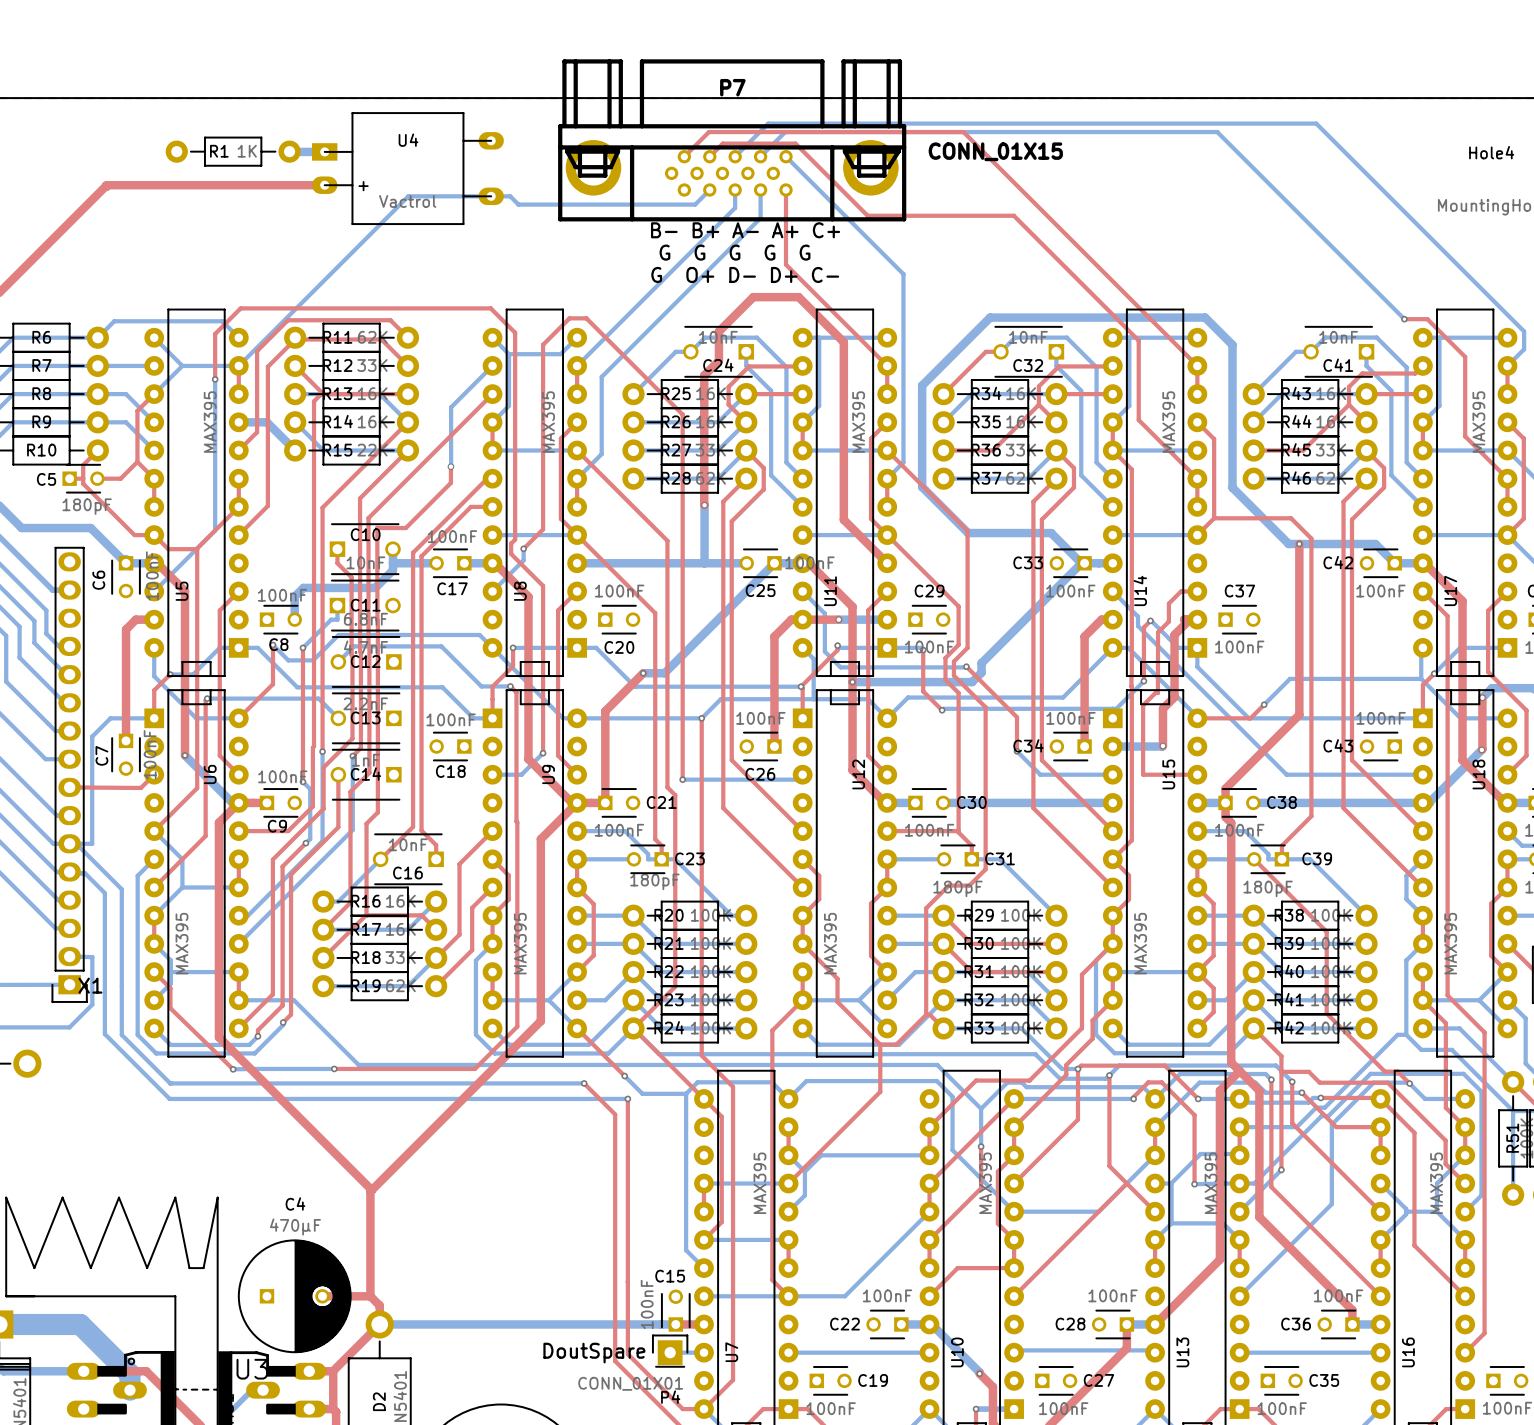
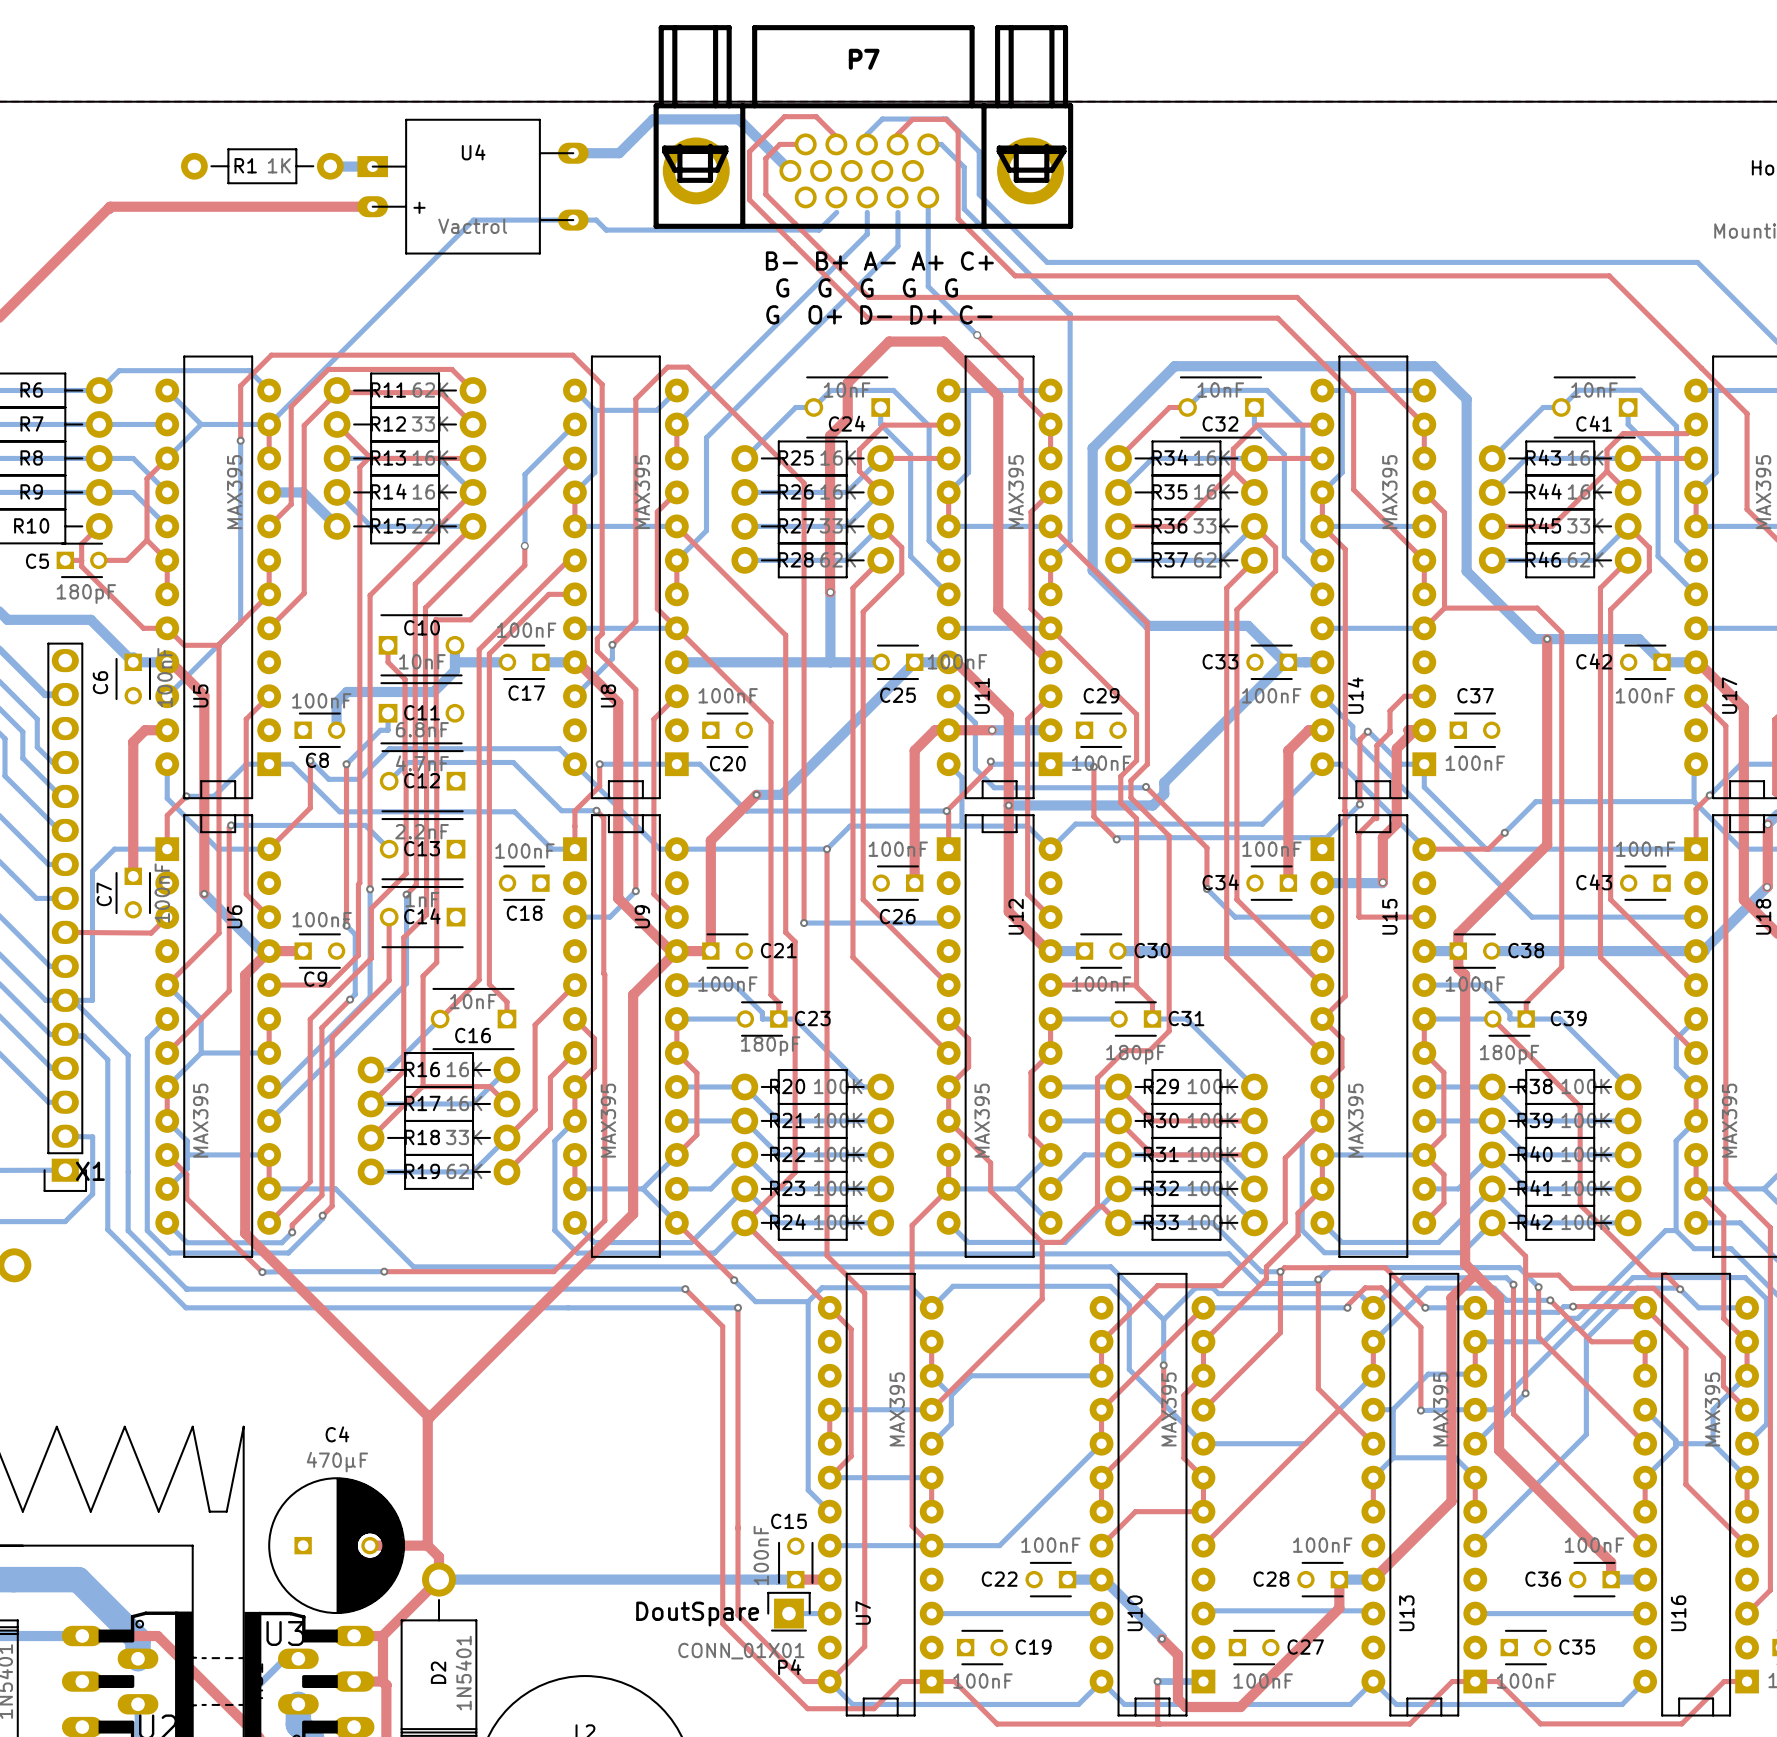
P7 footprint: [558, 59, 907, 222] -> [653, 25, 1074, 229]
bottom track: none -> (928, 144) (941, 144) (964, 167) (964, 209) (1070, 314)
bottom track: none -> (573, 153) (619, 153) (653, 119) (738, 119) (790, 170)
P7 value: CONN_01X15 (995, 151) -> none
top track: (684, 156) (708, 132) (963, 132) (1091, 260) -> (805, 144) (779, 144) (765, 158) (765, 194) (868, 297) (1297, 297)
top track: (709, 156) (722, 143) (795, 143) (867, 215) (1013, 215) (1075, 277) -> (836, 144) (836, 136) (816, 116) (784, 116) (749, 151) (749, 199) (867, 318) (1277, 318)
bottom track: (735, 156) (768, 123) (1316, 123) (1424, 231) -> (866, 144) (866, 134) (882, 119) (946, 119) (979, 151) (979, 194) (1047, 262) (1697, 262)
bottom track: (760, 156) (785, 132) (1217, 132) (1404, 319) -> none
bottom track: (786, 156) (903, 274) -> none
bottom track: none -> (928, 197) (928, 286) (977, 335)
top track: (786, 189) (786, 264) (862, 341) -> (977, 335) (1021, 378) (1021, 394)
via: none -> (977, 335)
top track: (1404, 319) (1427, 319) -> (897, 144) (897, 134) (912, 119) (945, 119) (958, 131) (958, 218) (1015, 275) (1609, 275) (1701, 368)
via: (1404, 319) -> none

